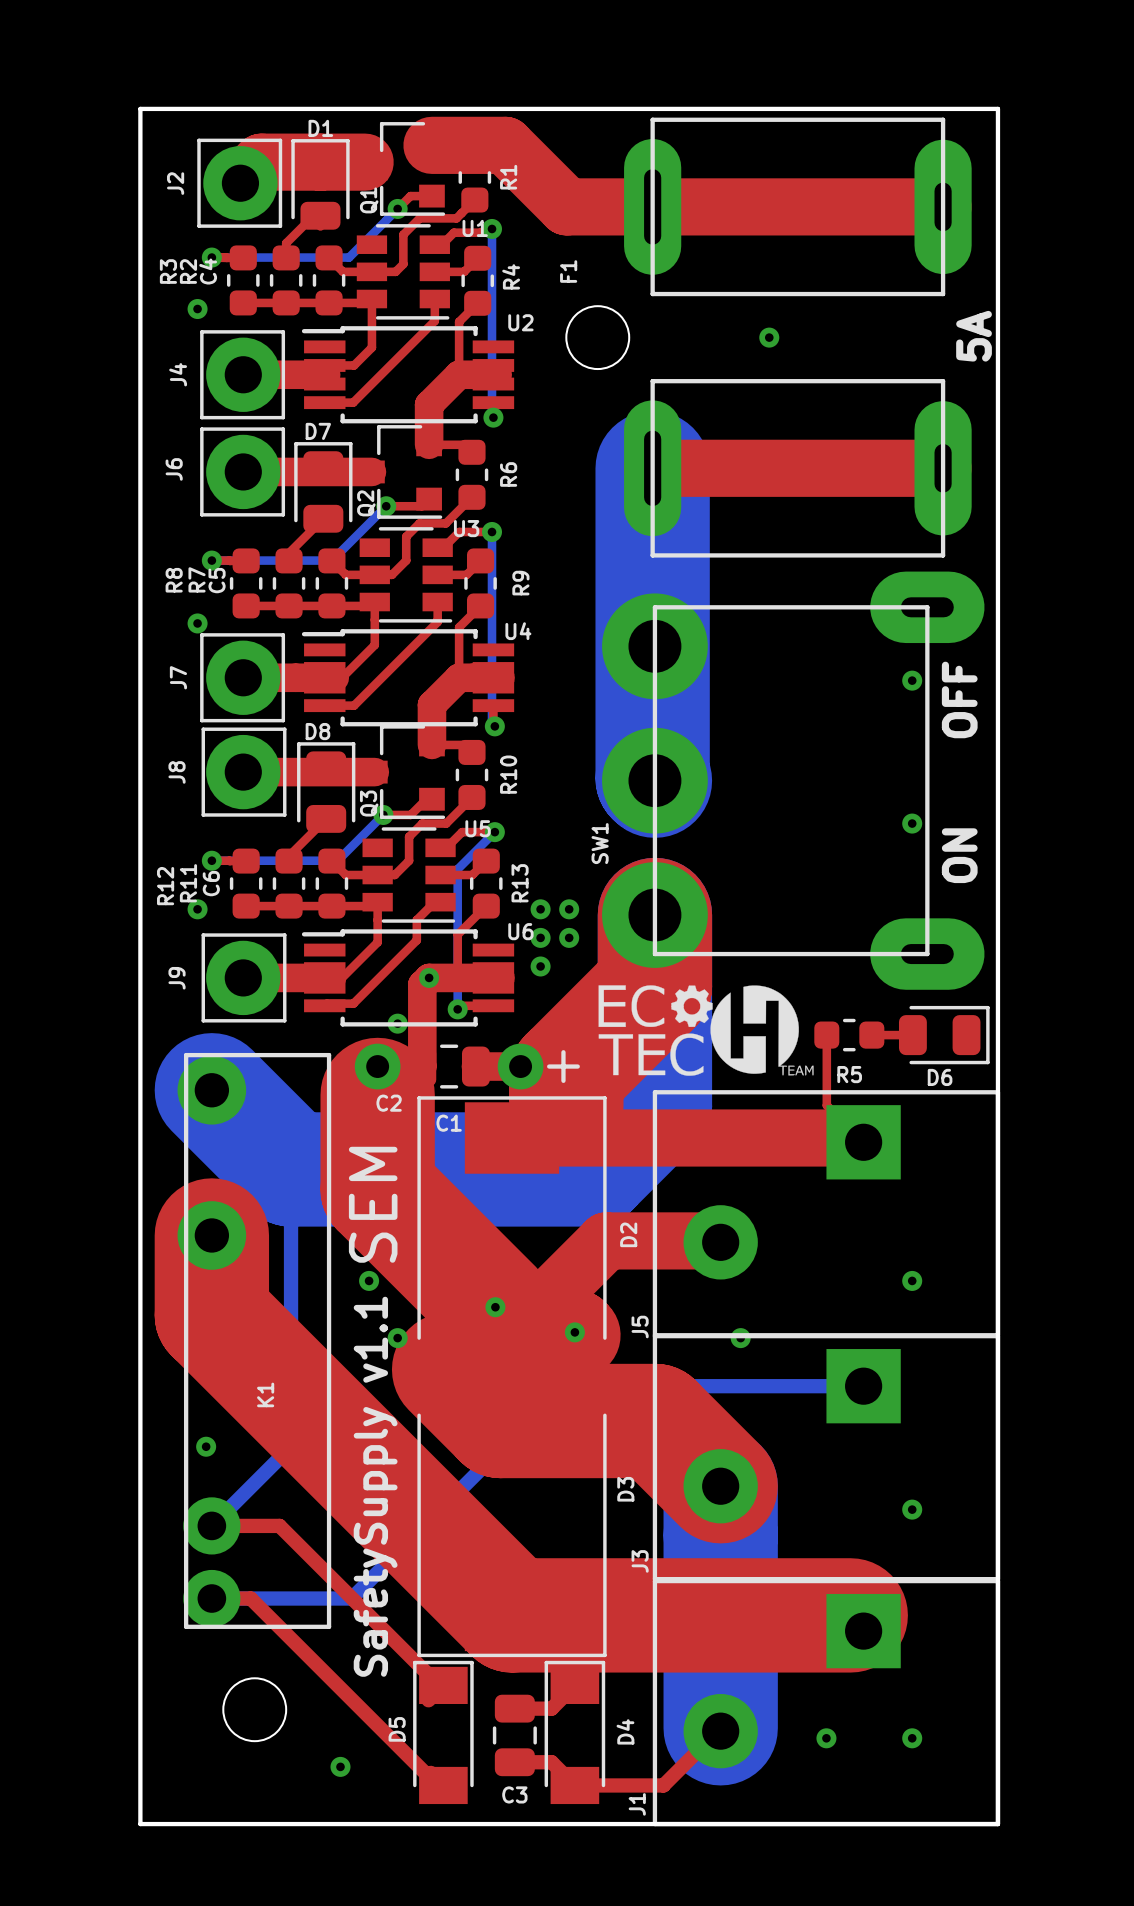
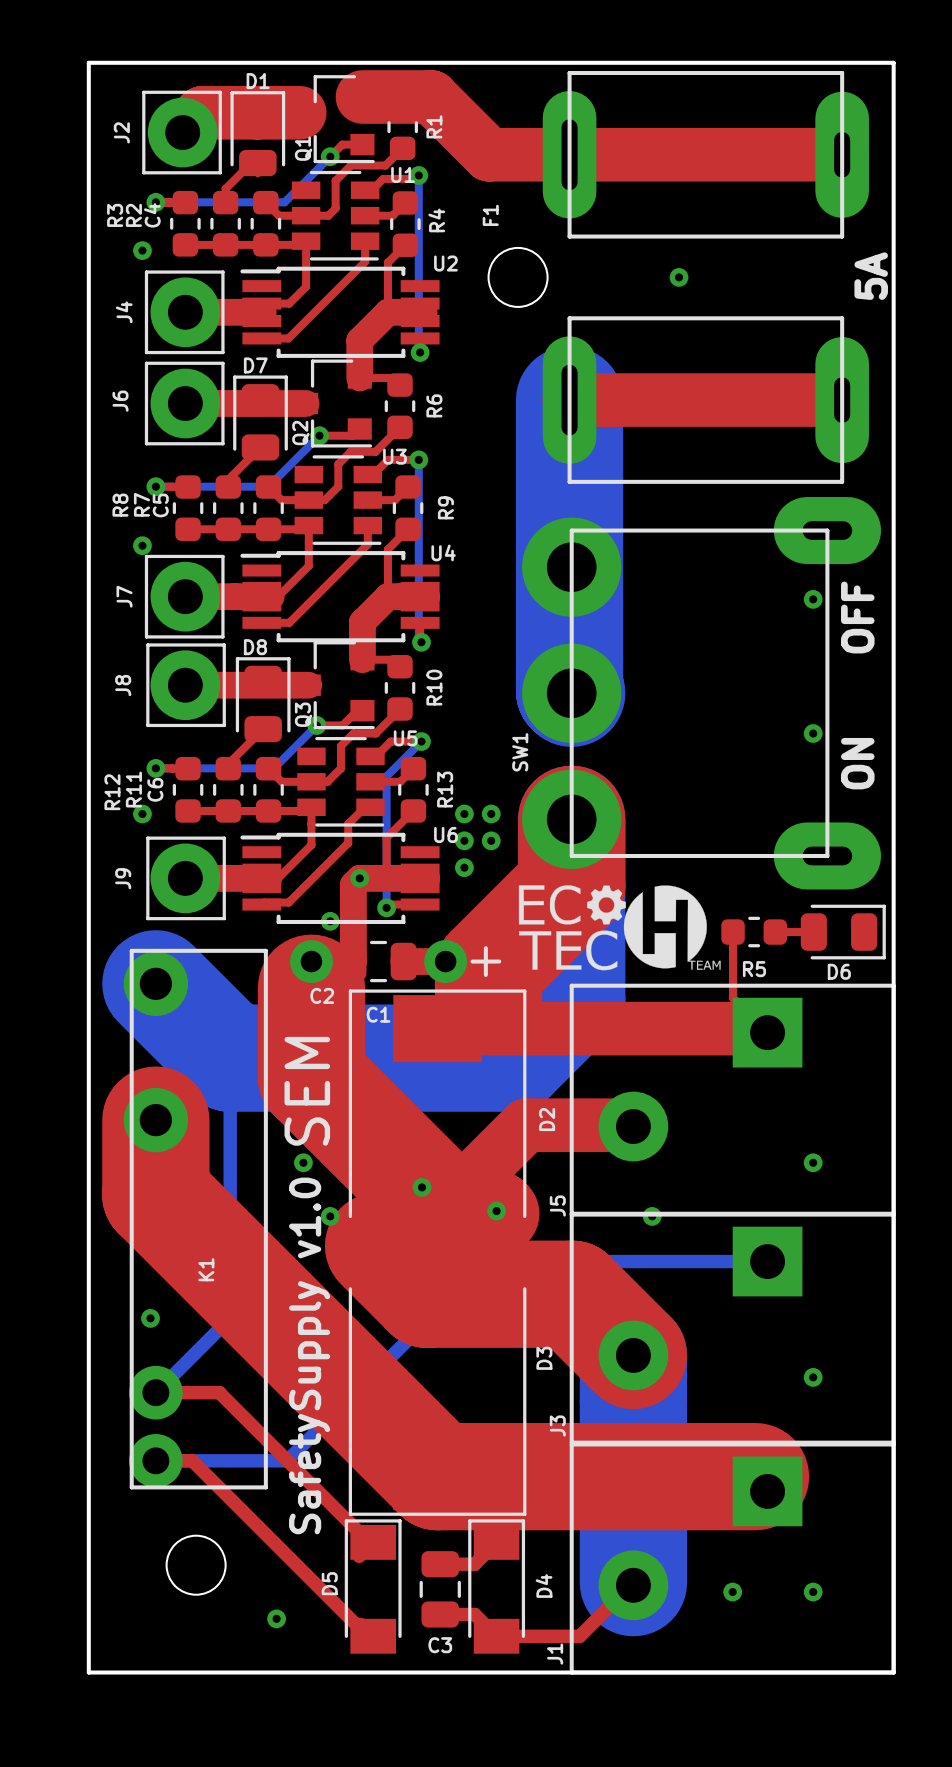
text: SafetySupply v1.1 (375, 1486) -> SafetySupply v1.0 (309, 1355)

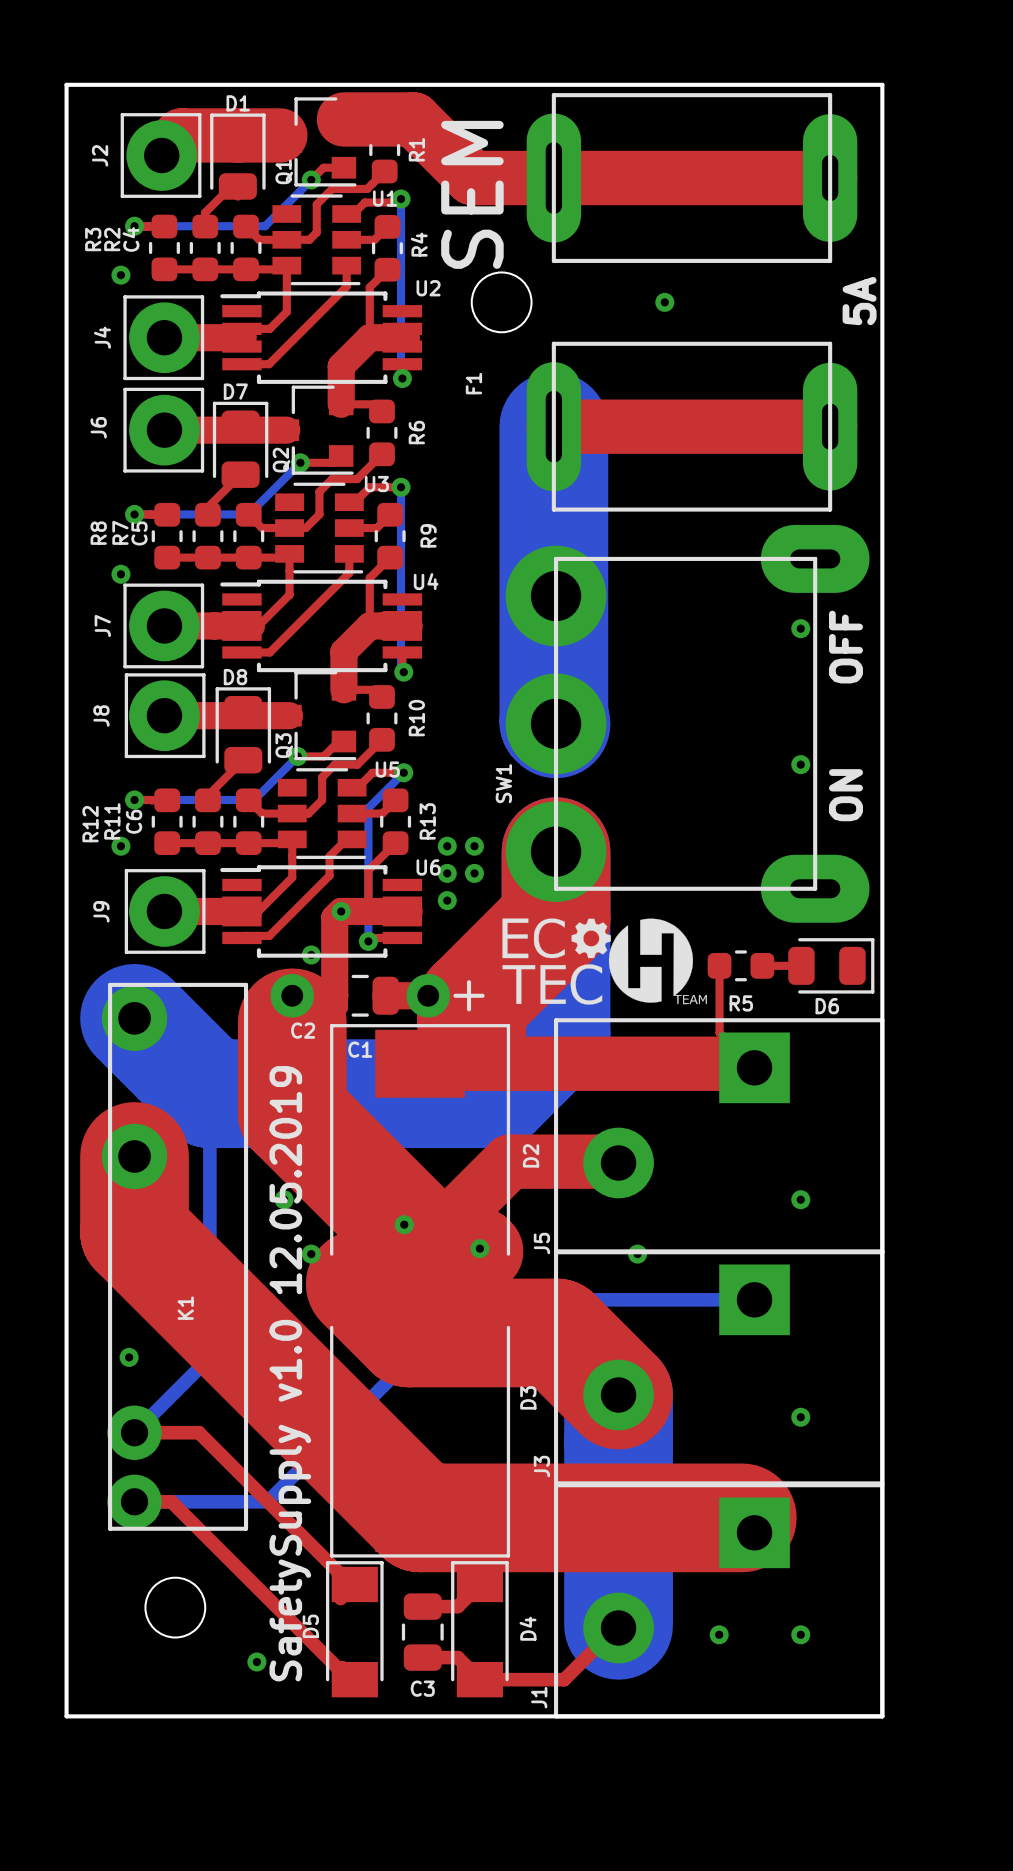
text: none -> SEM (472, 194)
F1 name position: F1 (490, 215) -> F1 (473, 383)
text: SEM (307, 1091) -> none
text: SafetySupply v1.0 (309, 1355) -> SafetySupply v1.0 12.05.2019 (290, 1373)

